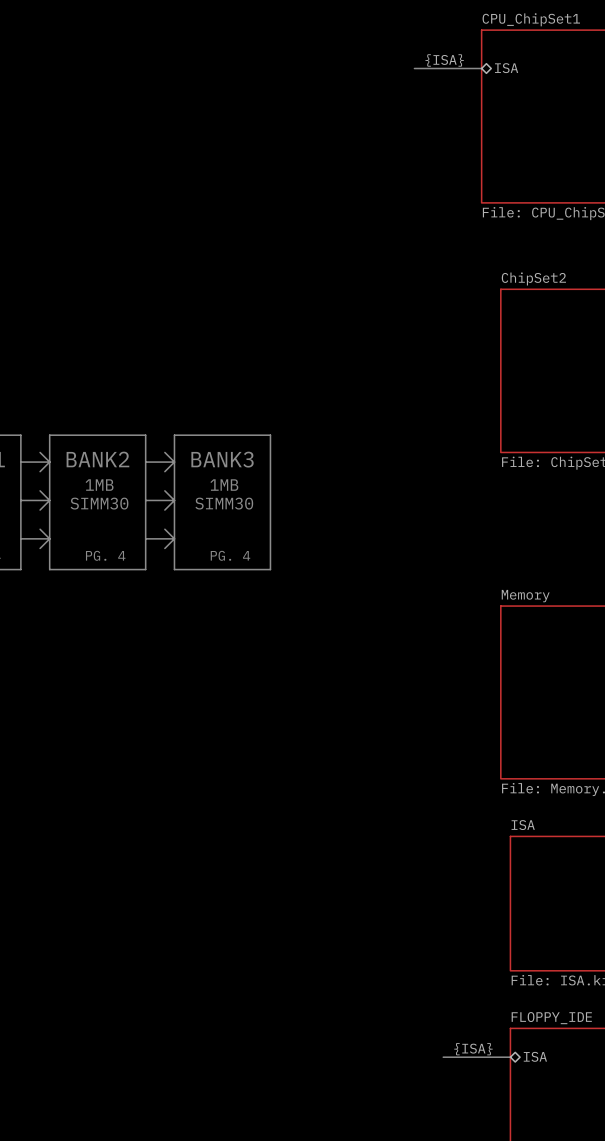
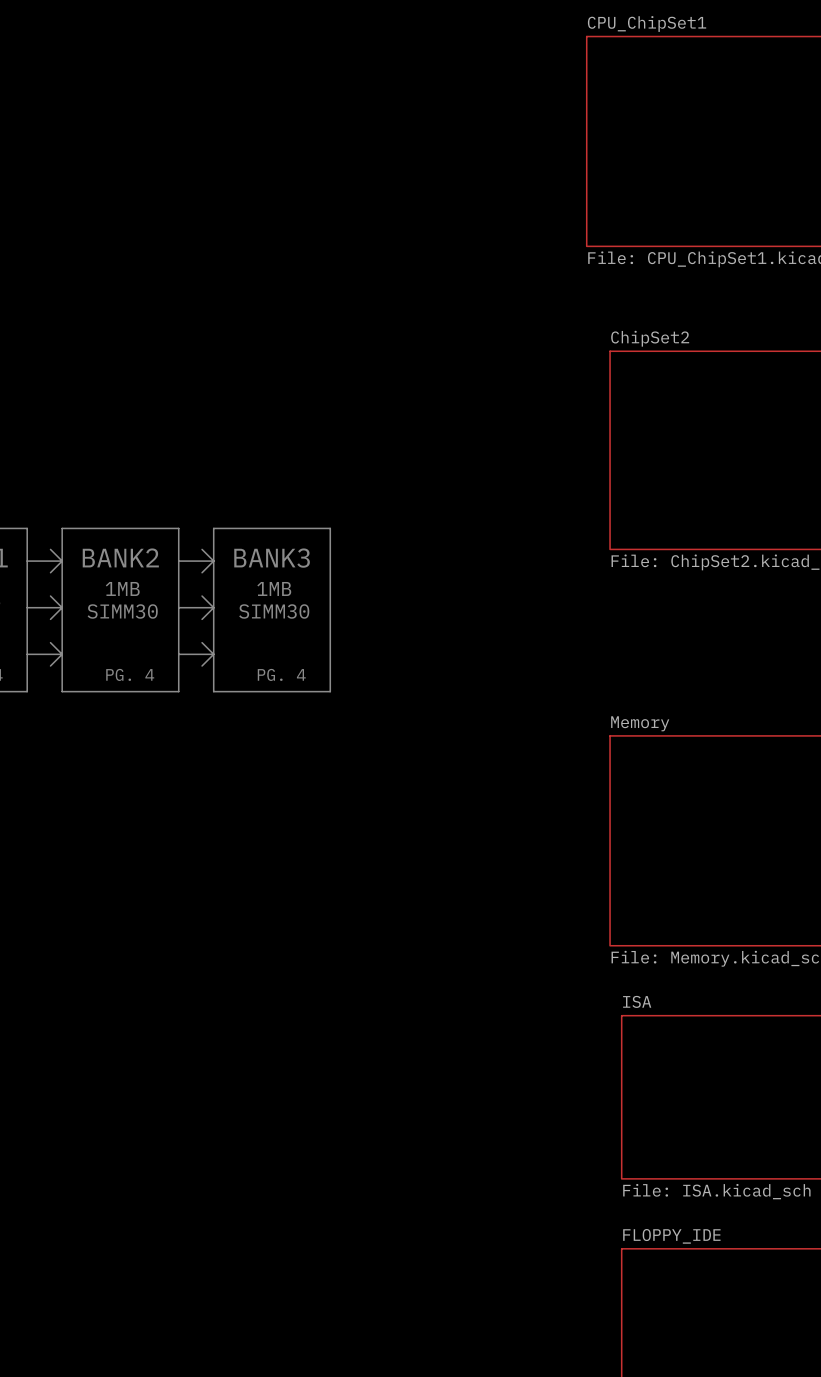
label: {ISA} (444, 60) -> none
bus: (414, 68) (481, 68) -> none
hierarchical label: ISA (506, 68) -> none
label: {ISA} (473, 1049) -> none
hierarchical label: ISA (535, 1056) -> none
bus: (443, 1057) (510, 1057) -> none

